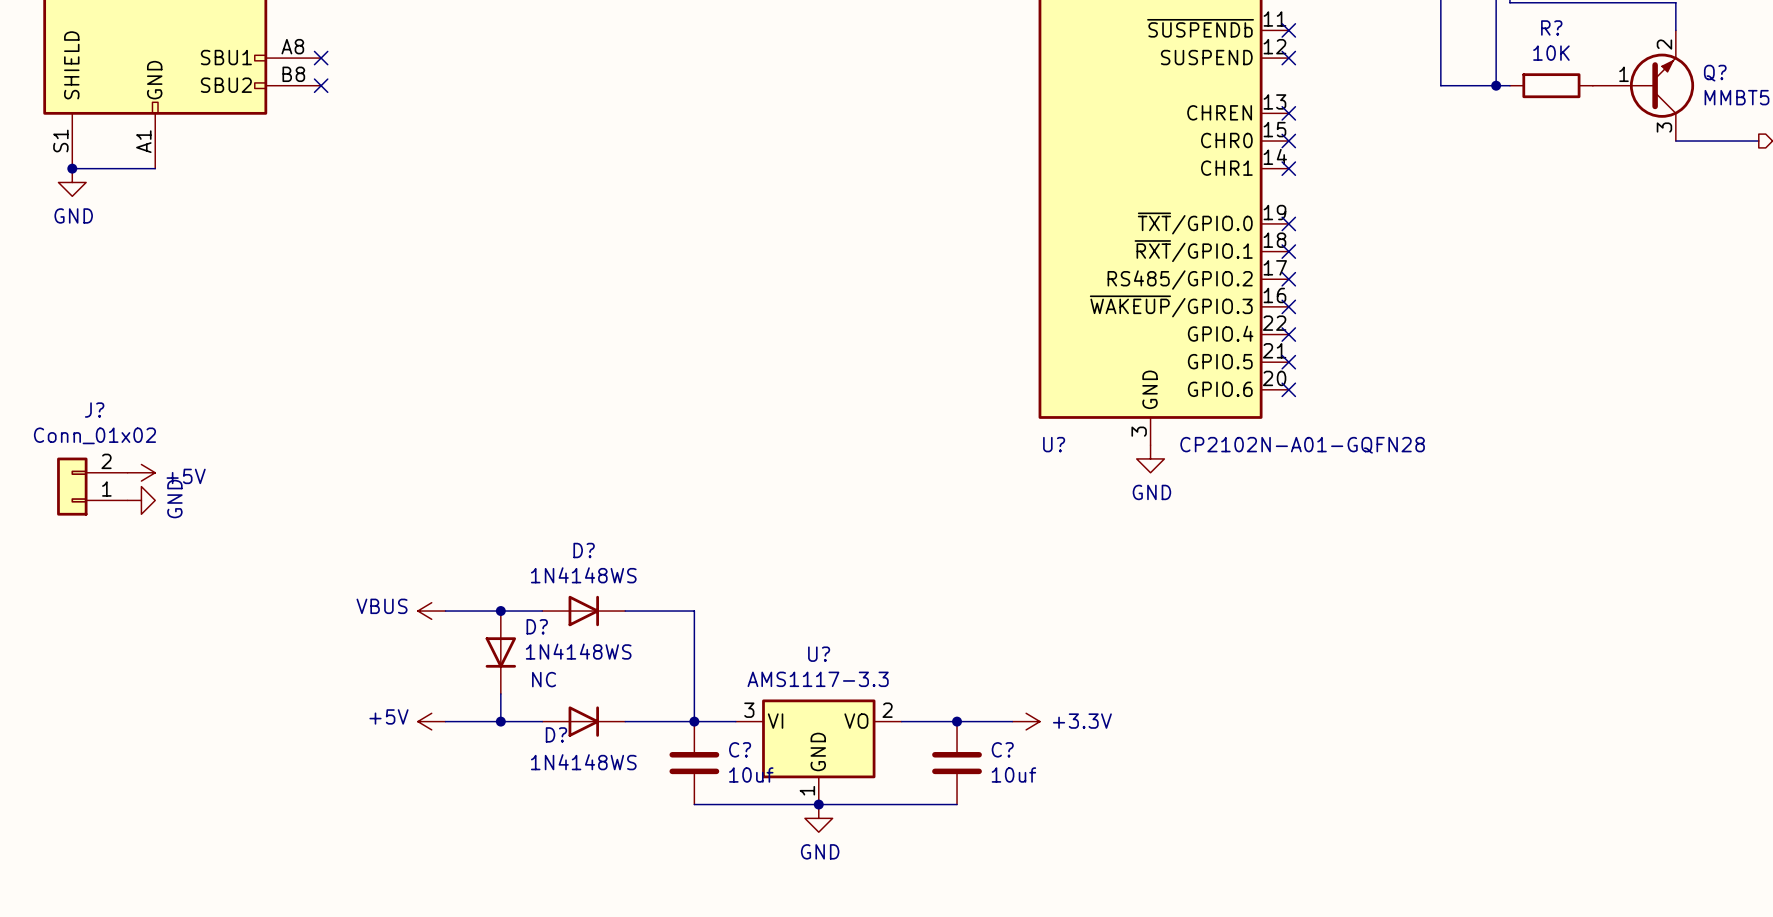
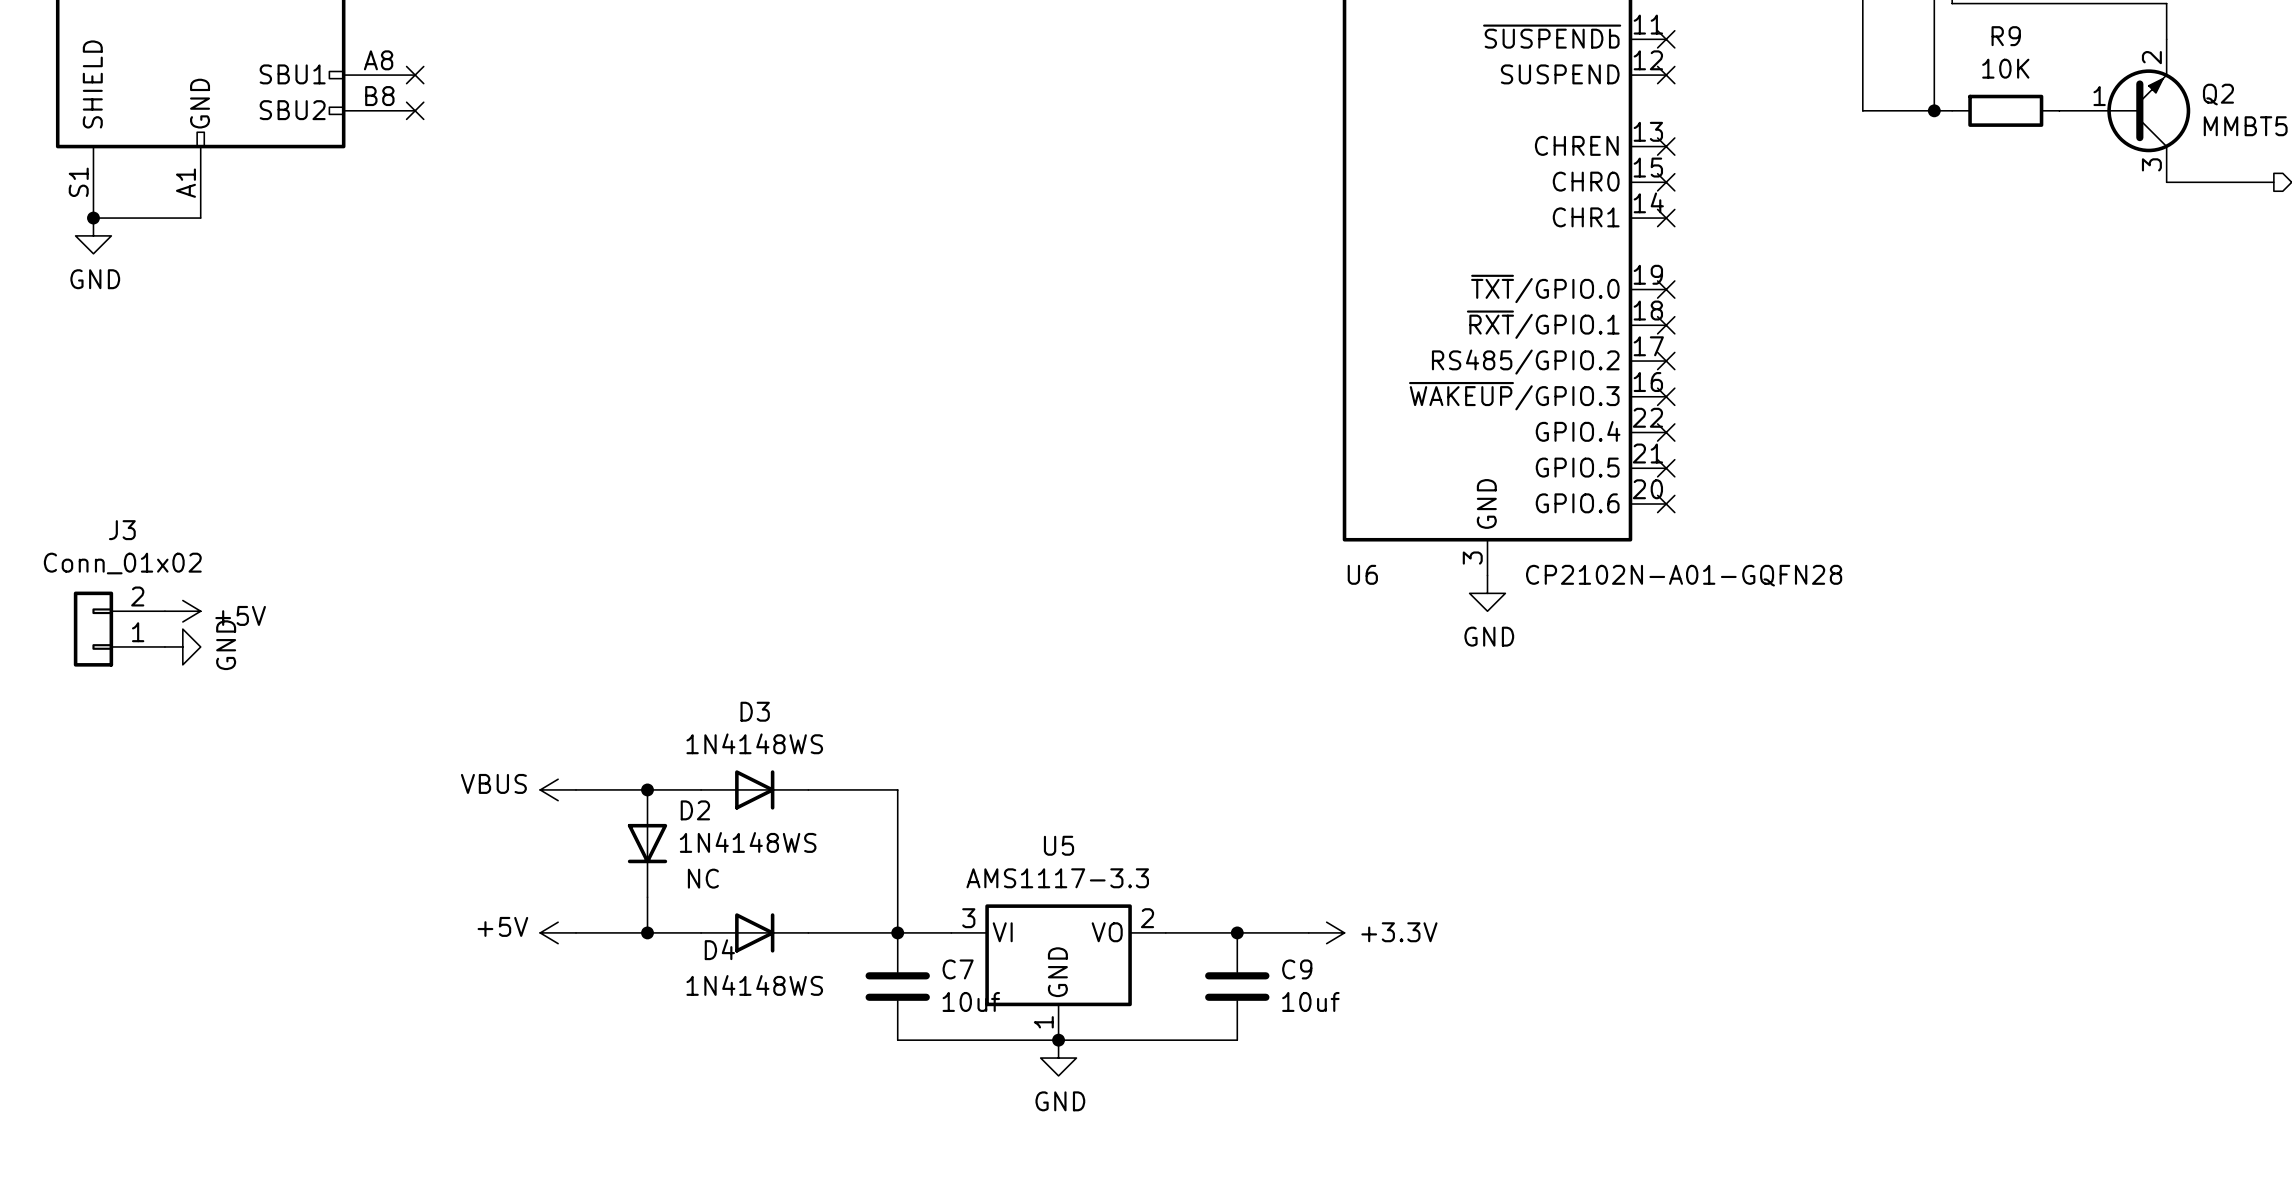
R? name: R? (1551, 27) -> R9 (2006, 36)
Q? name: Q? (1715, 73) -> Q2 (2218, 94)
J? name: J? (94, 410) -> J3 (122, 530)
U? name: U? (1054, 444) -> U6 (1362, 574)
D? name: D? (584, 550) -> D3 (755, 711)
D? name: D? (537, 626) -> D2 (695, 810)
U? name: U? (819, 654) -> U5 (1058, 845)
D? name: D? (556, 734) -> D4 (719, 949)
C? name: C? (740, 749) -> C7 (958, 969)
C? name: C? (1002, 749) -> C9 (1297, 969)

